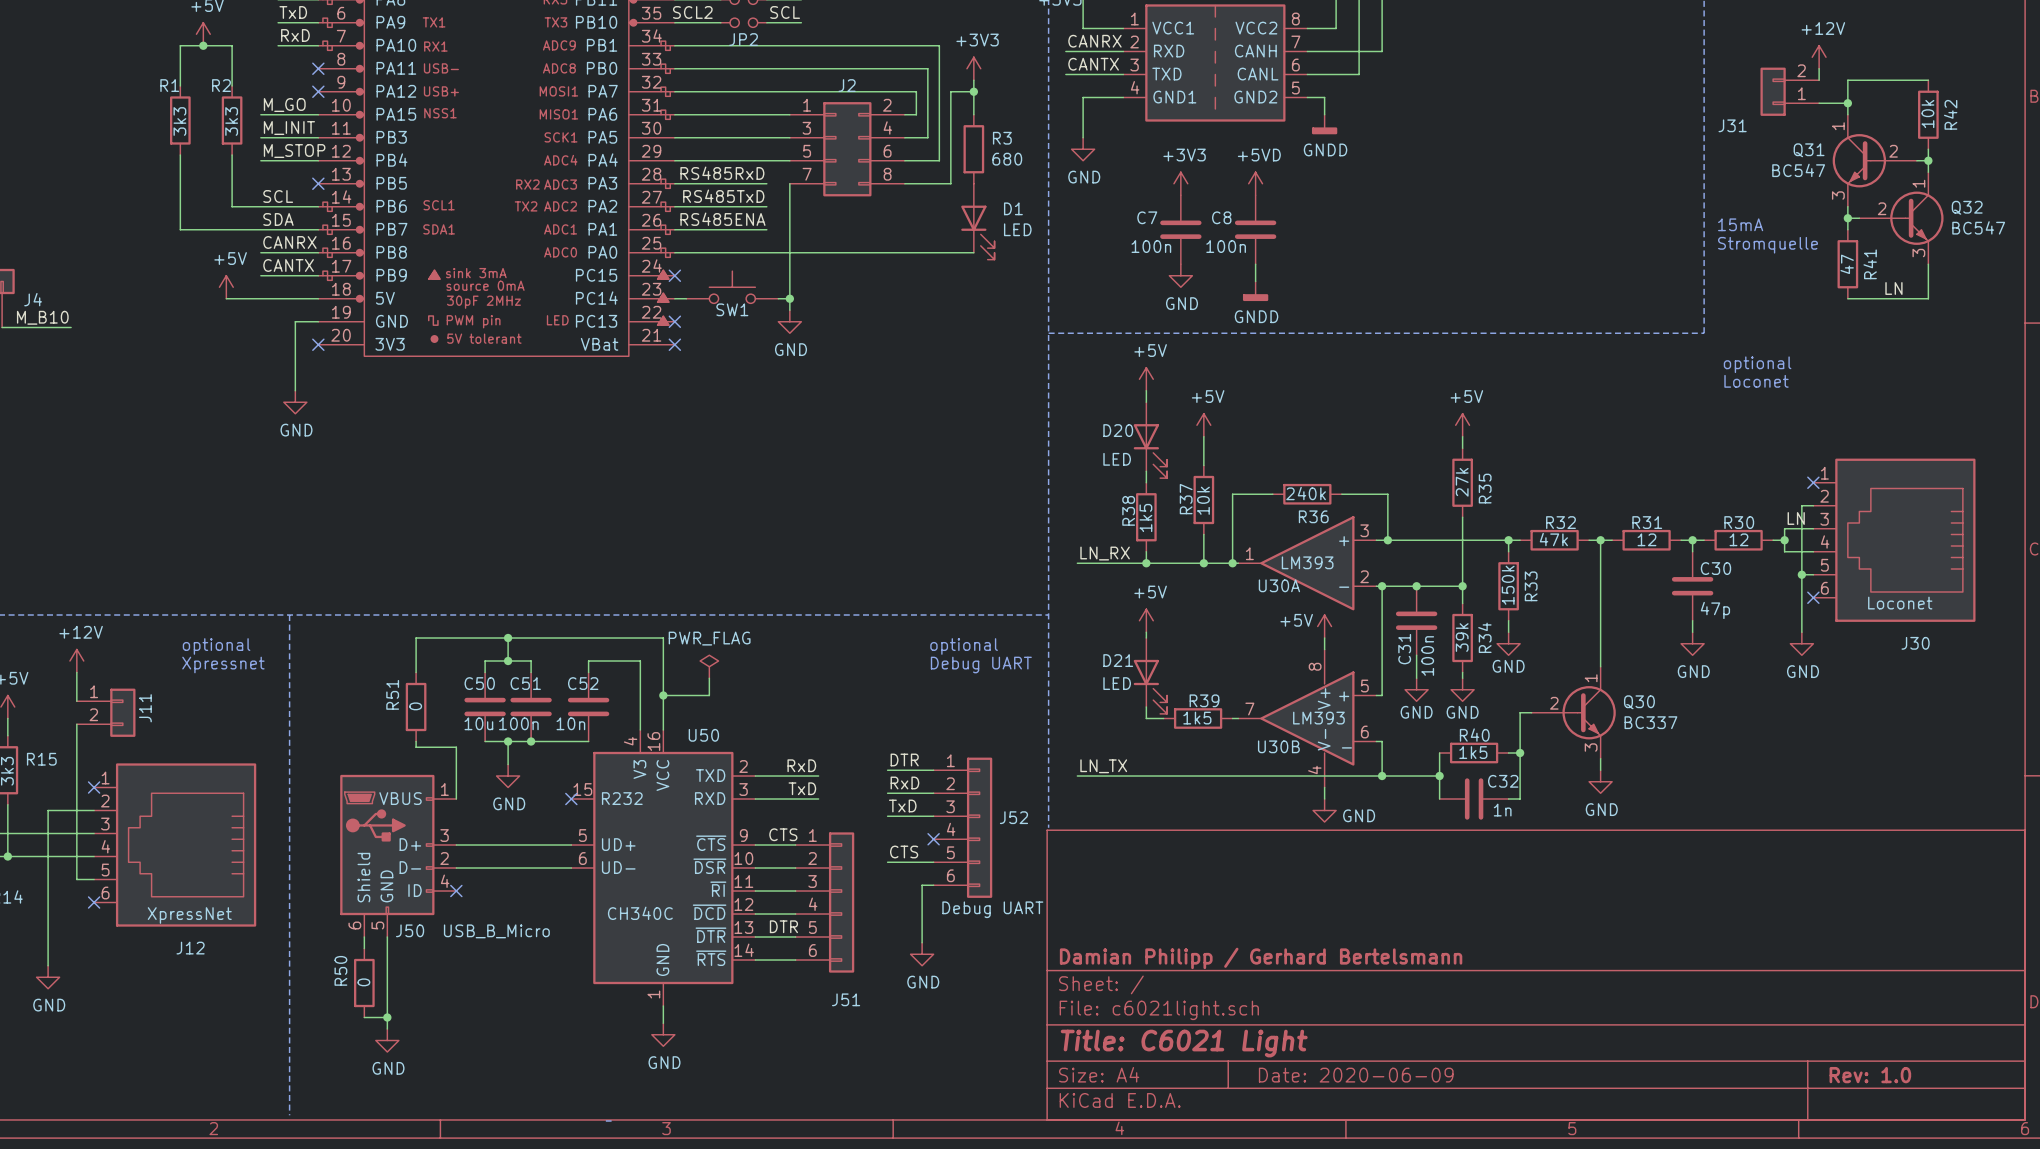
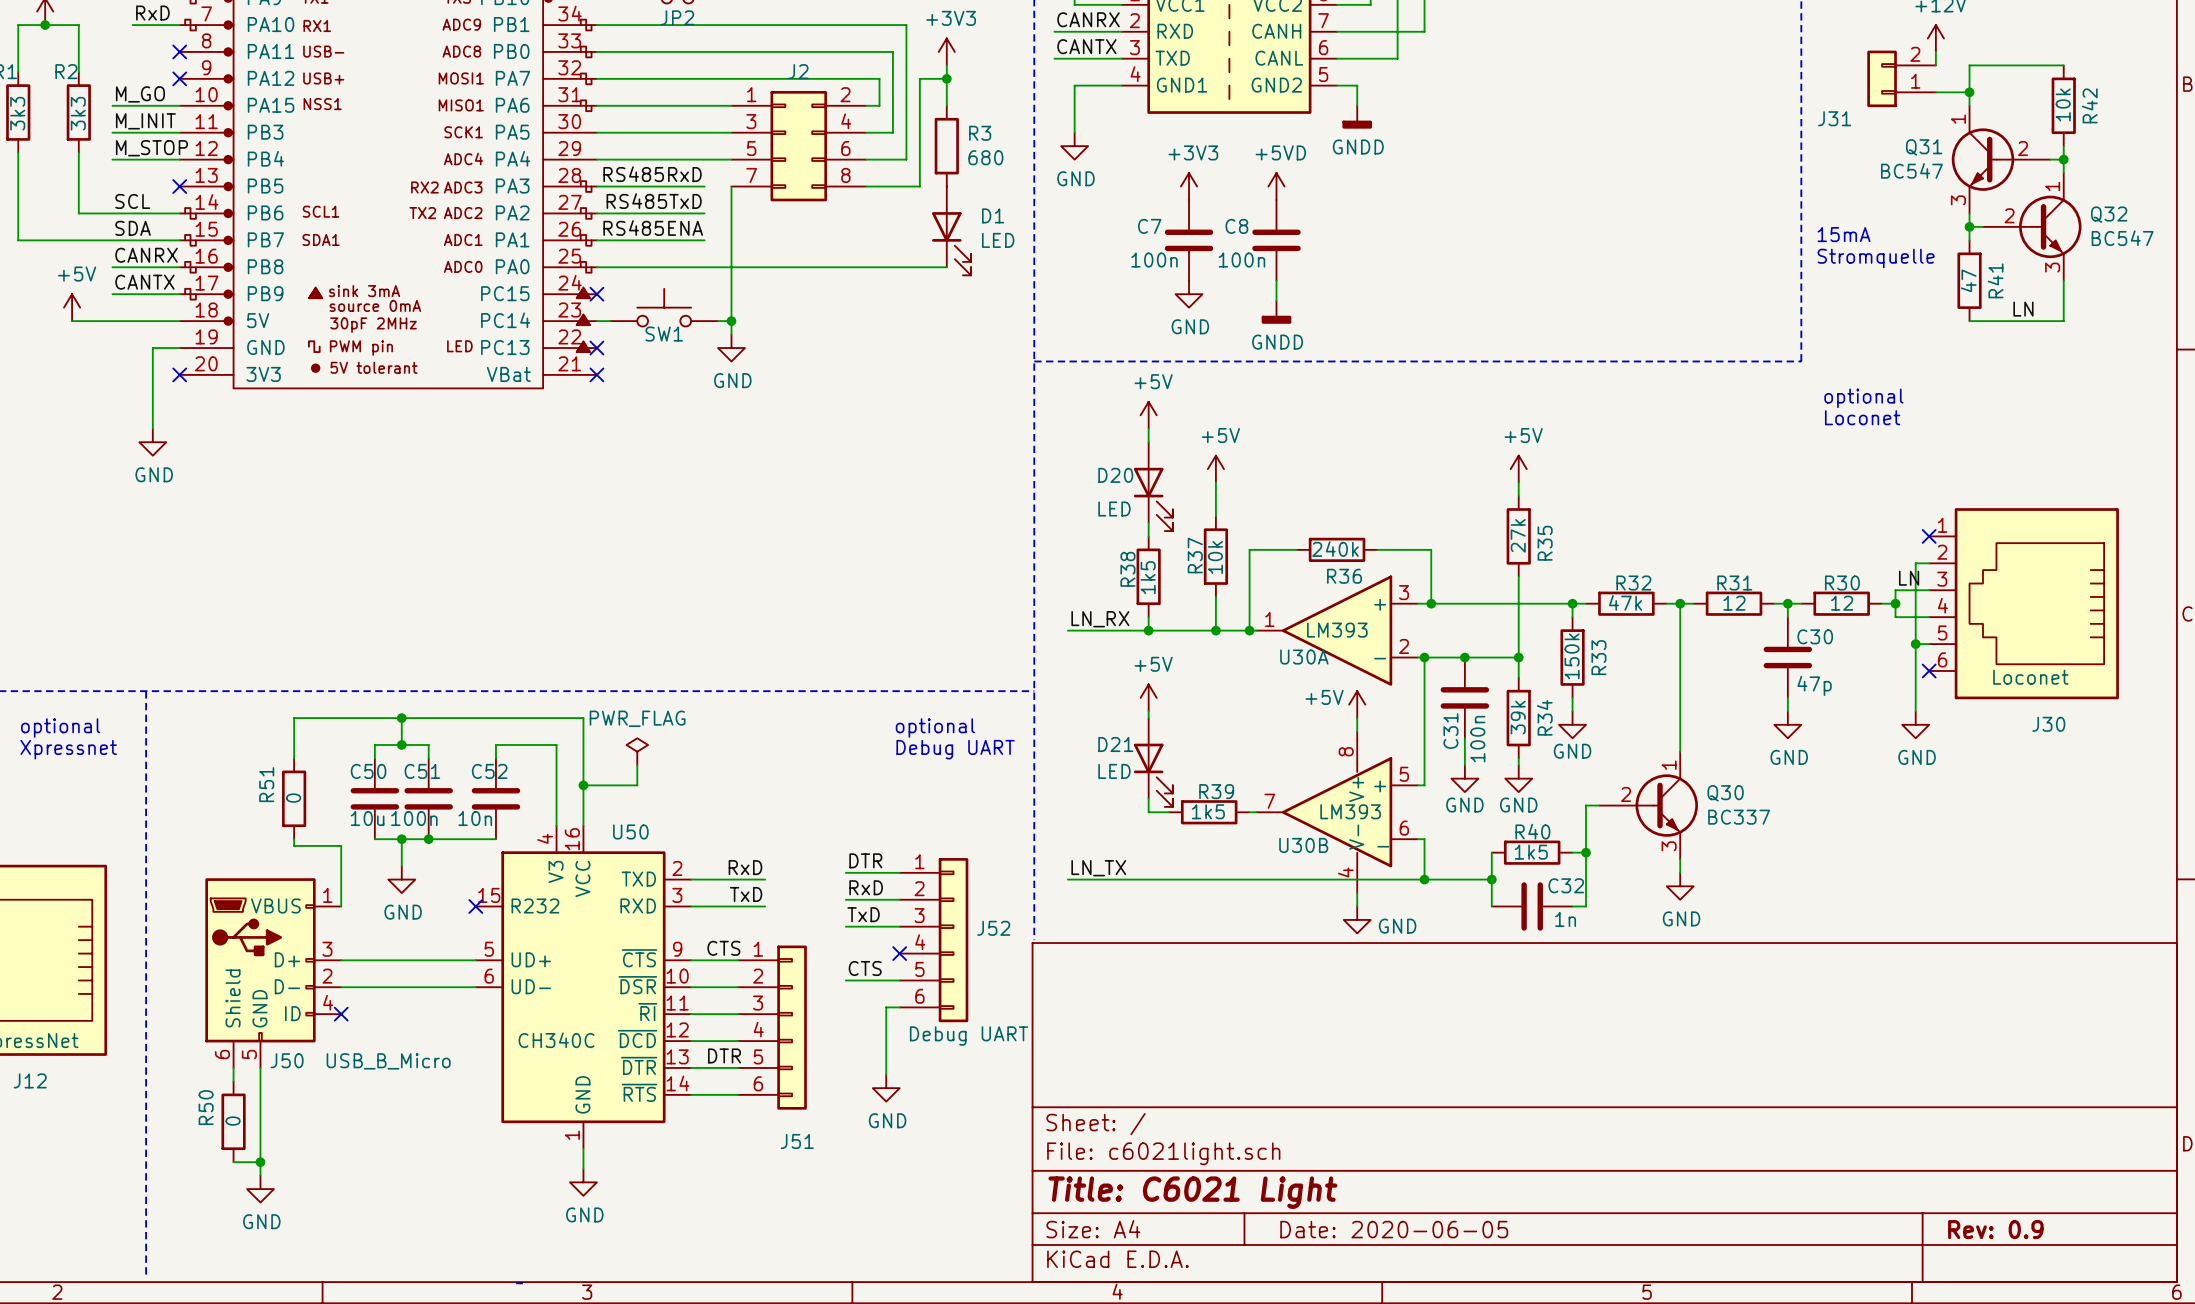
title block: Damian Philipp / Gerhard Bertelsmann (1261, 958) -> none
title block: Date: 2020-06-09 (1356, 1075) -> Date: 2020-06-05 (1394, 1229)
title block: Rev: 1.0 (1870, 1075) -> Rev: 0.9 (1995, 1229)

